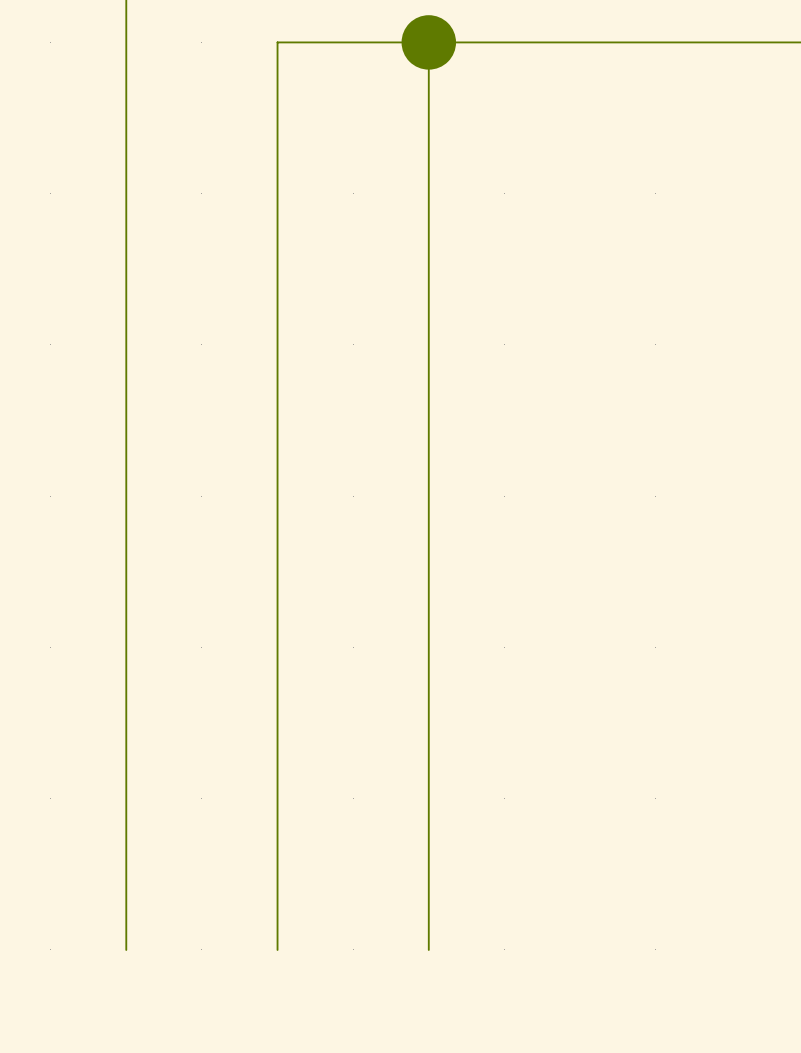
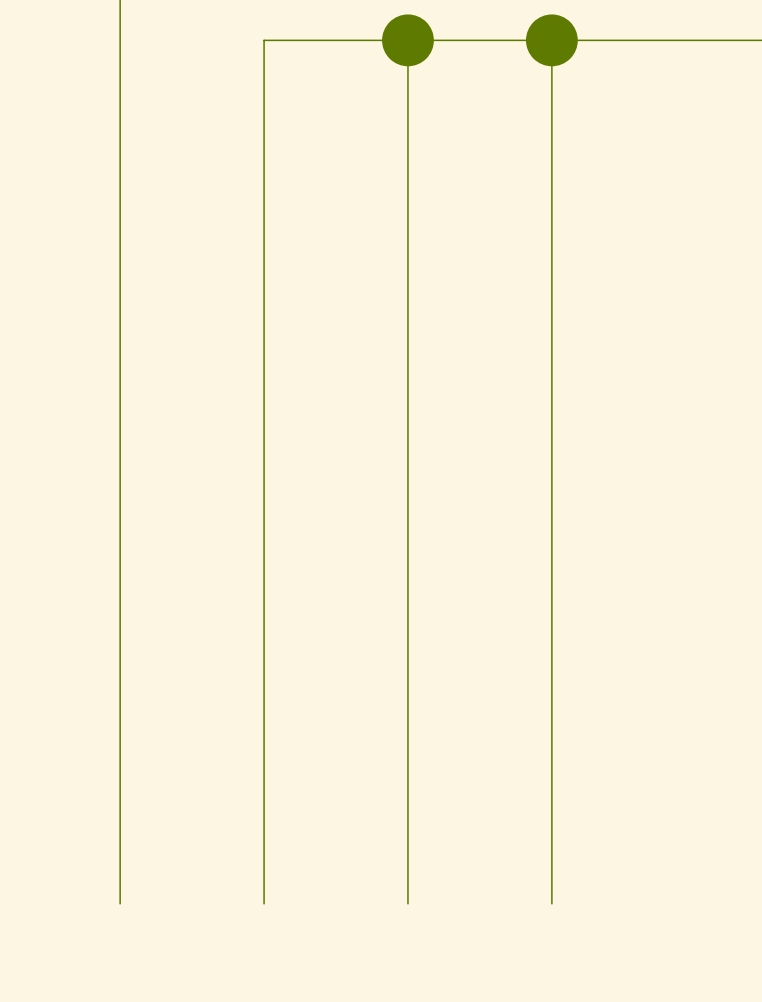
wire: none -> (551, 40) (551, 903)
junction: none -> (551, 40)

